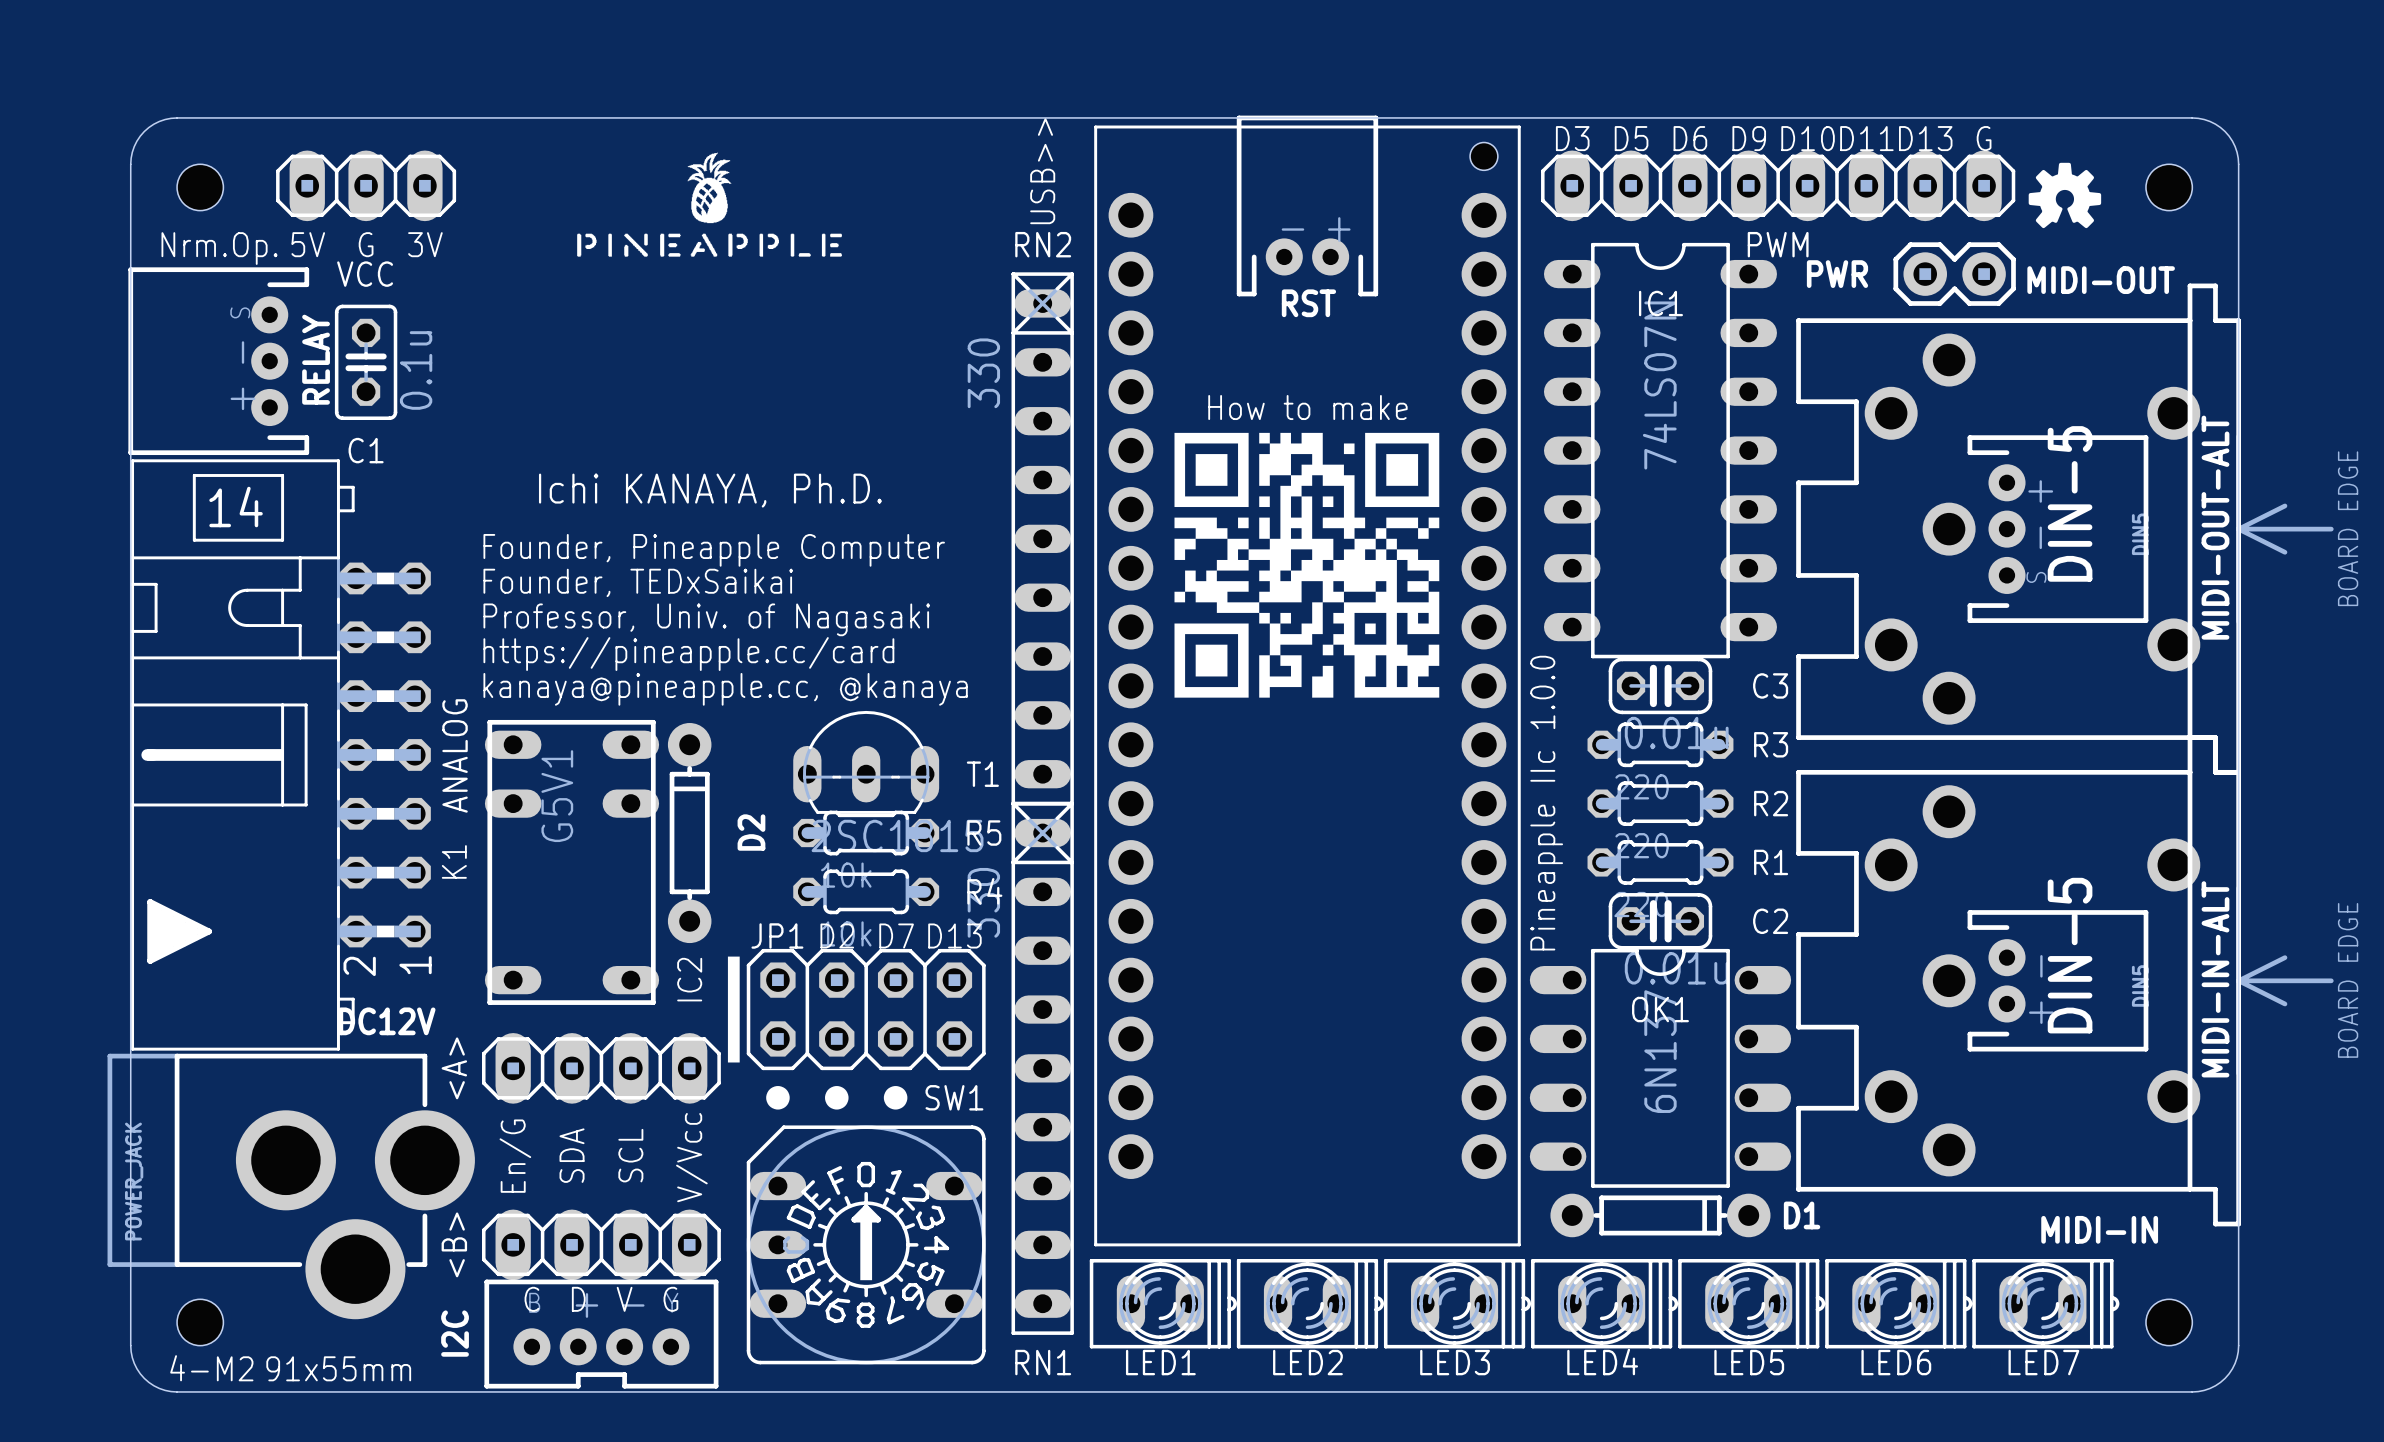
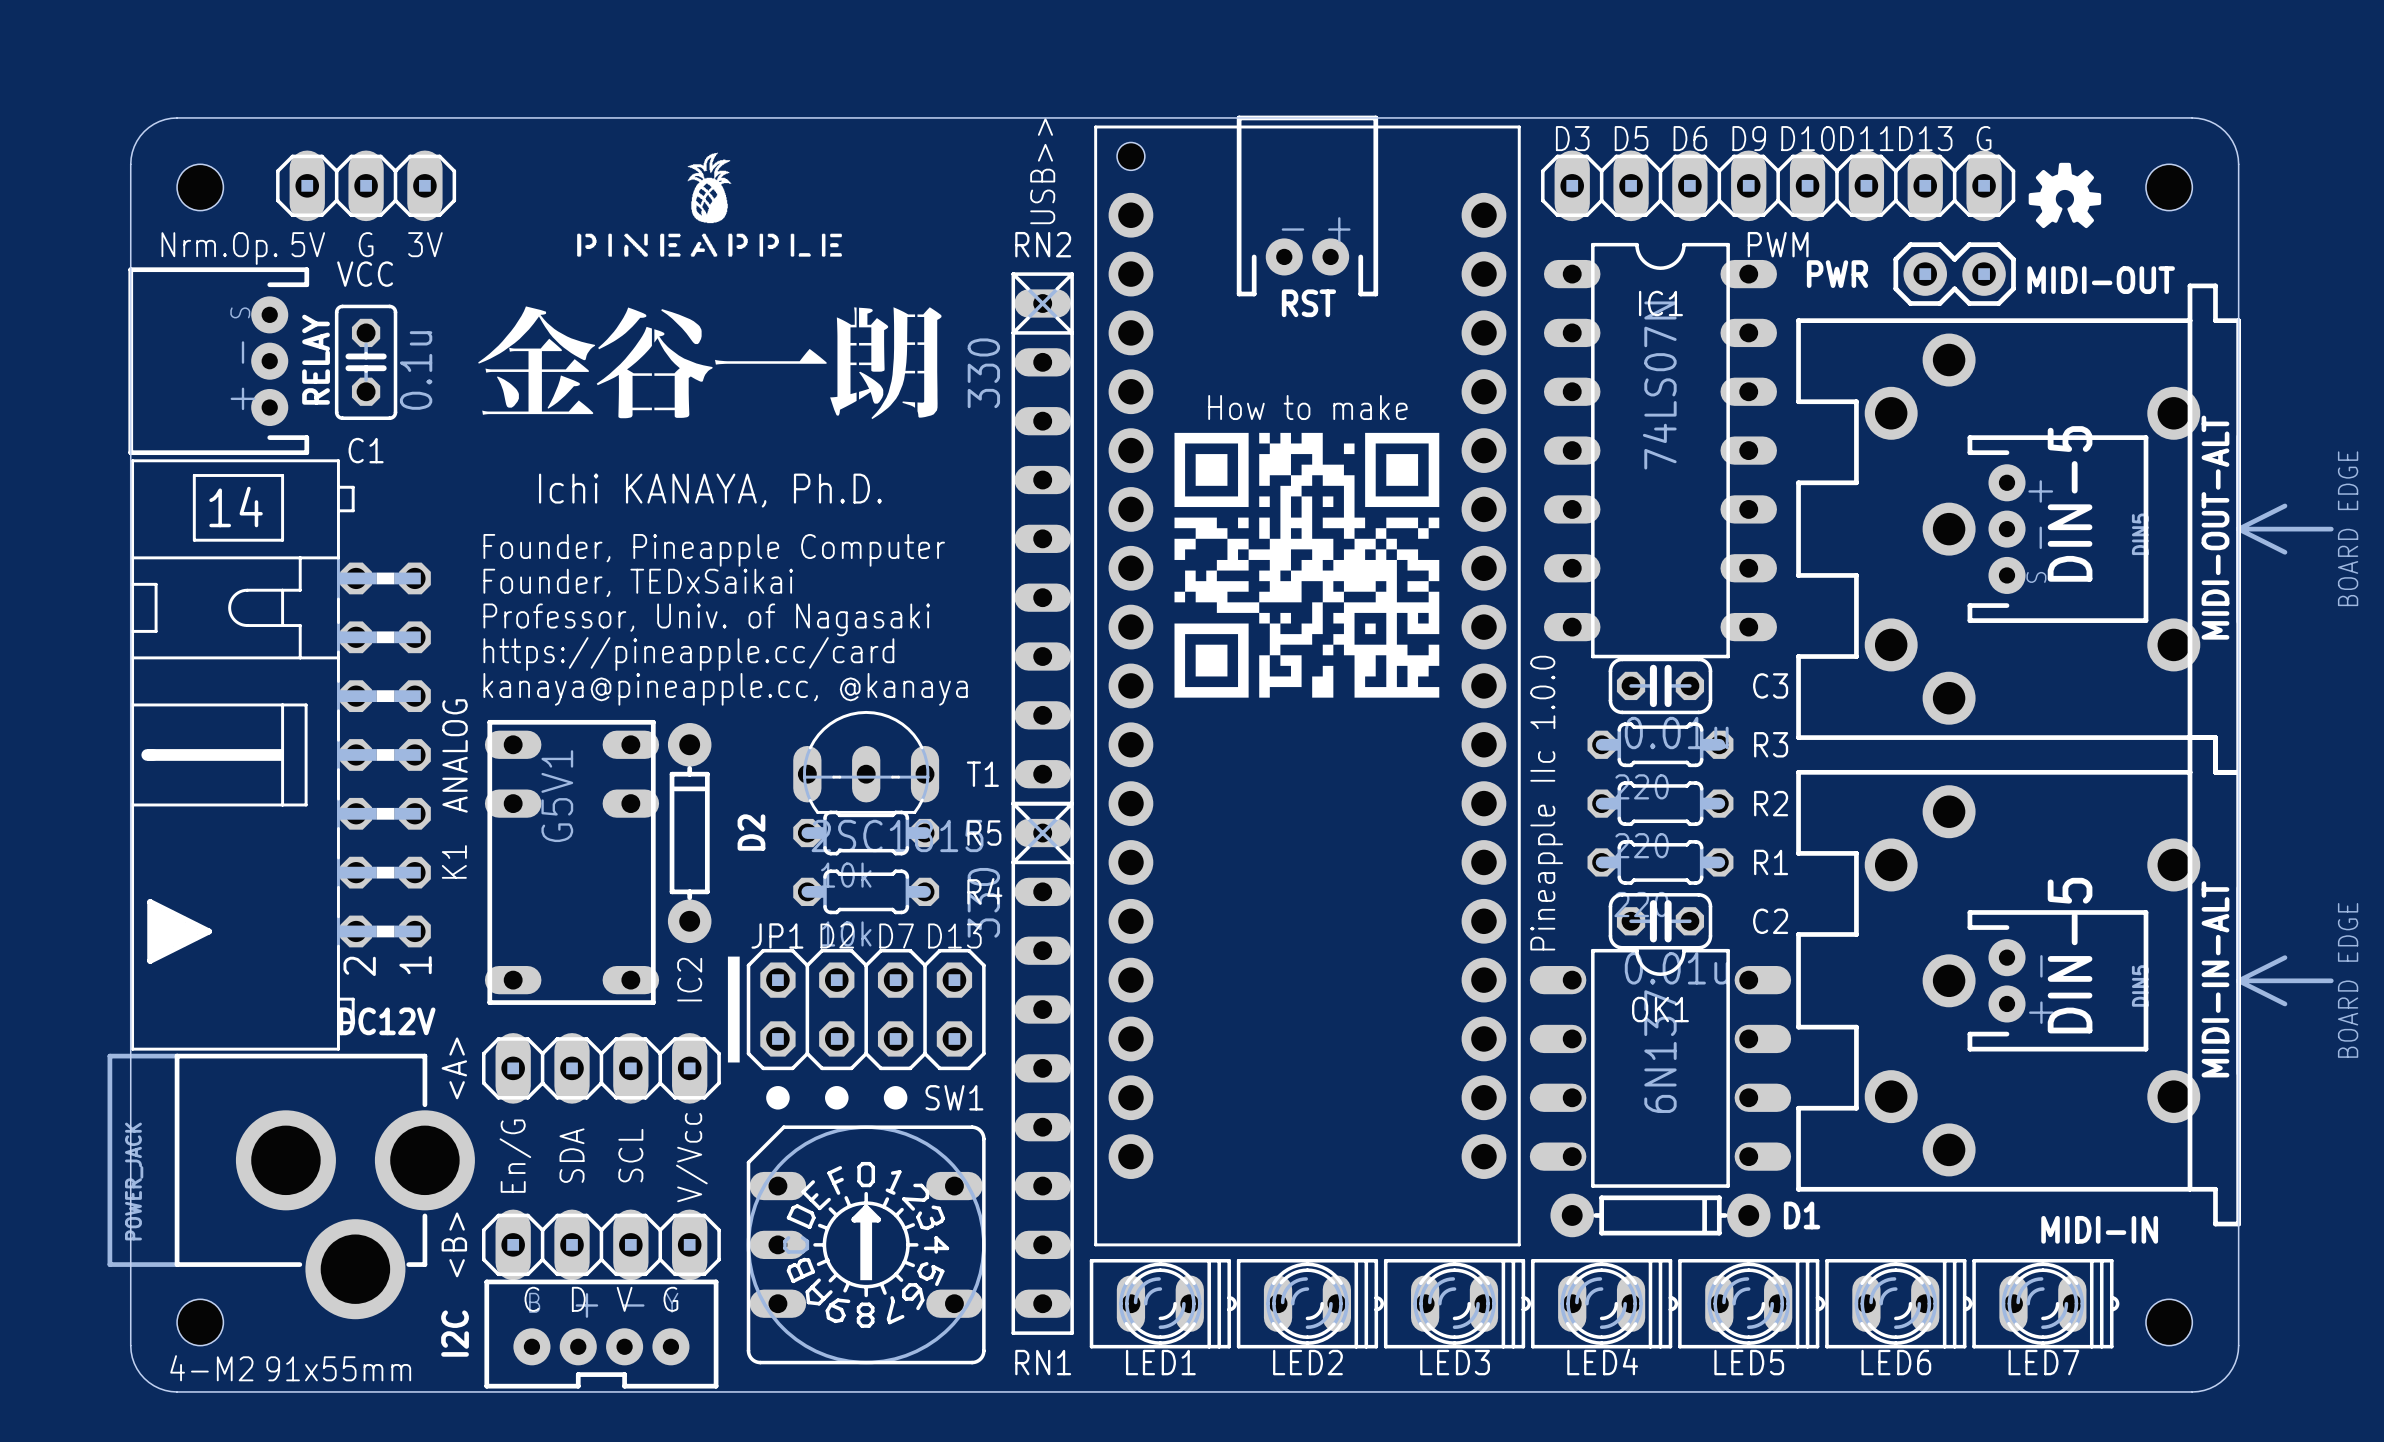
hole position: (1483, 156) -> (1130, 156)
drawing: none -> [478, 306, 942, 420]

